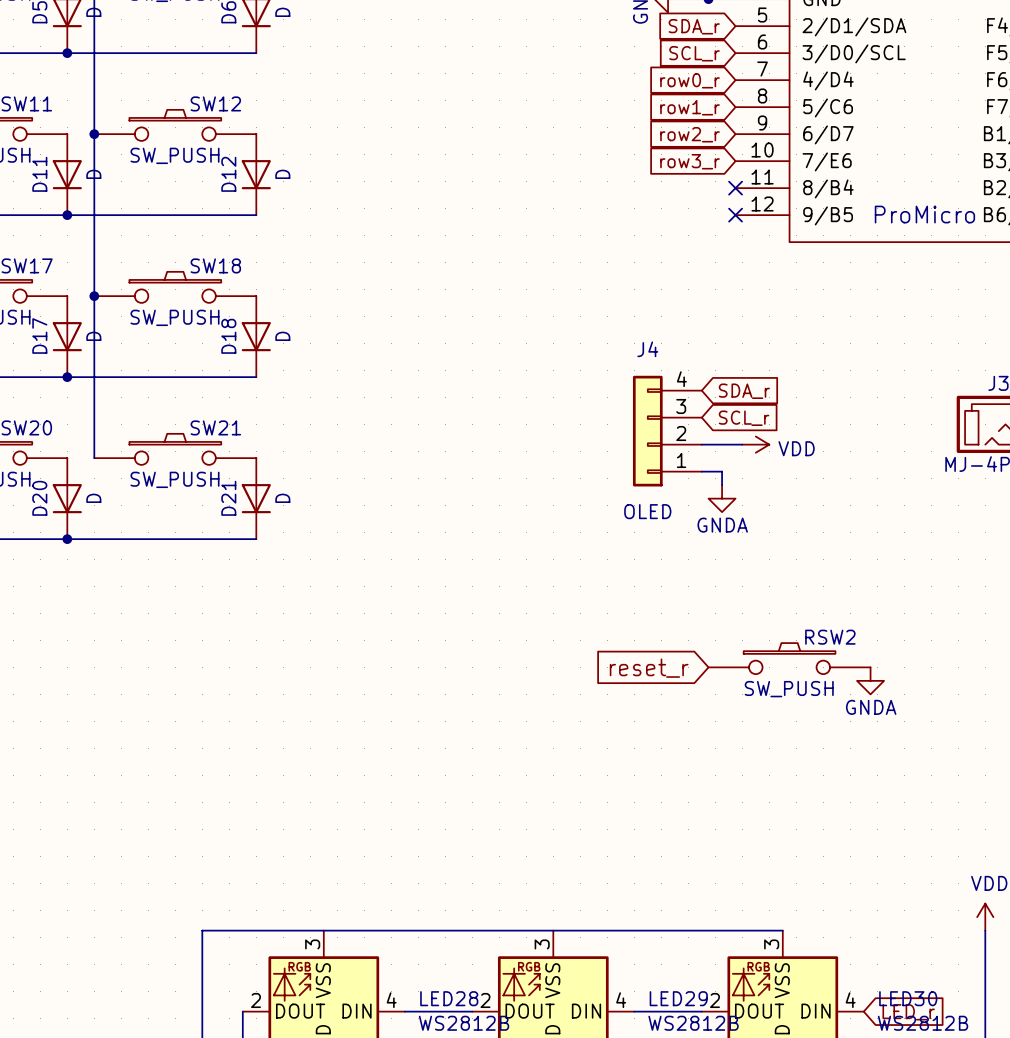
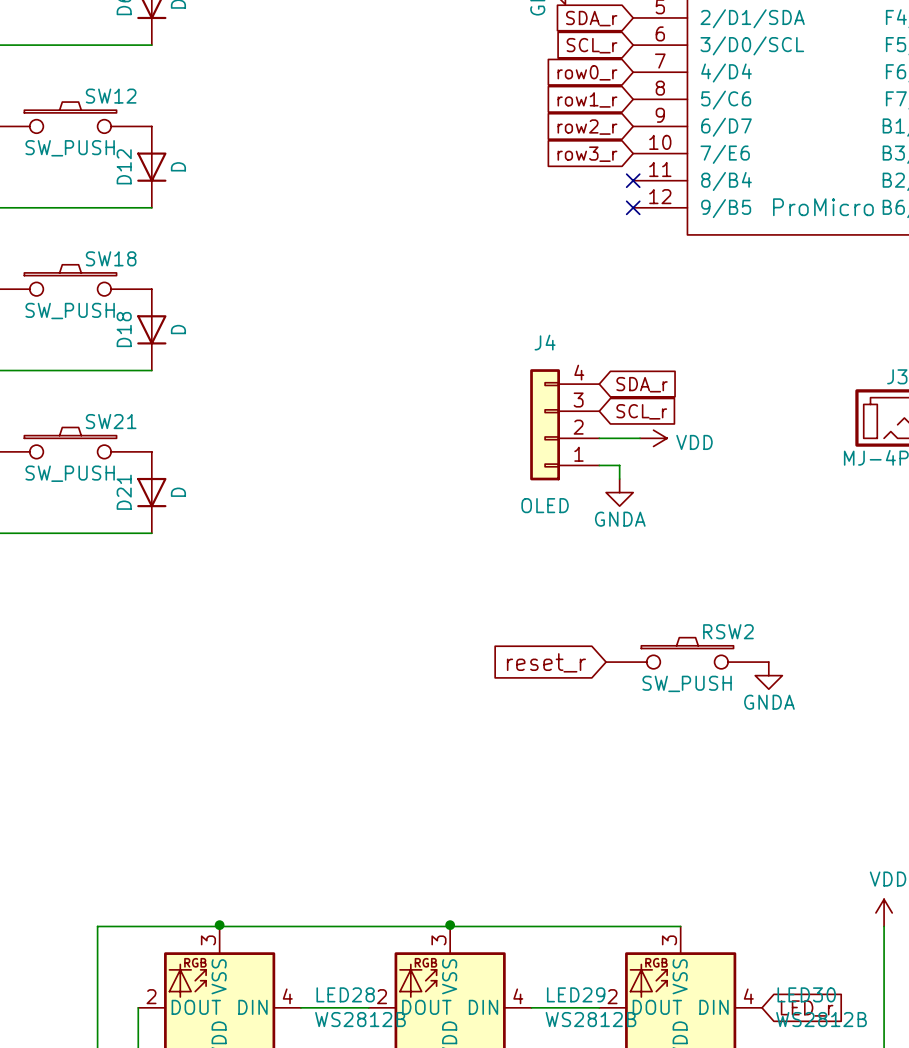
junction: none -> (219, 925)
junction: none -> (450, 925)

